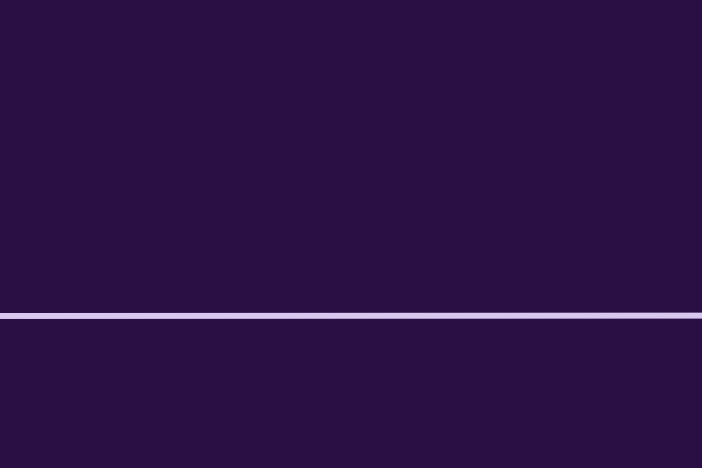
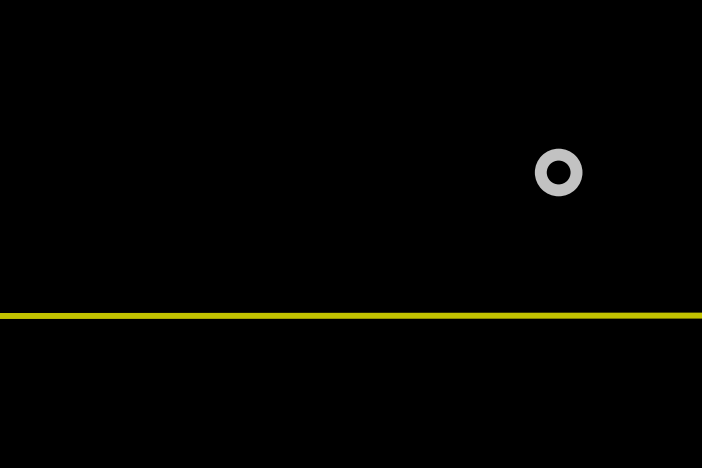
via: none -> (558, 172)

